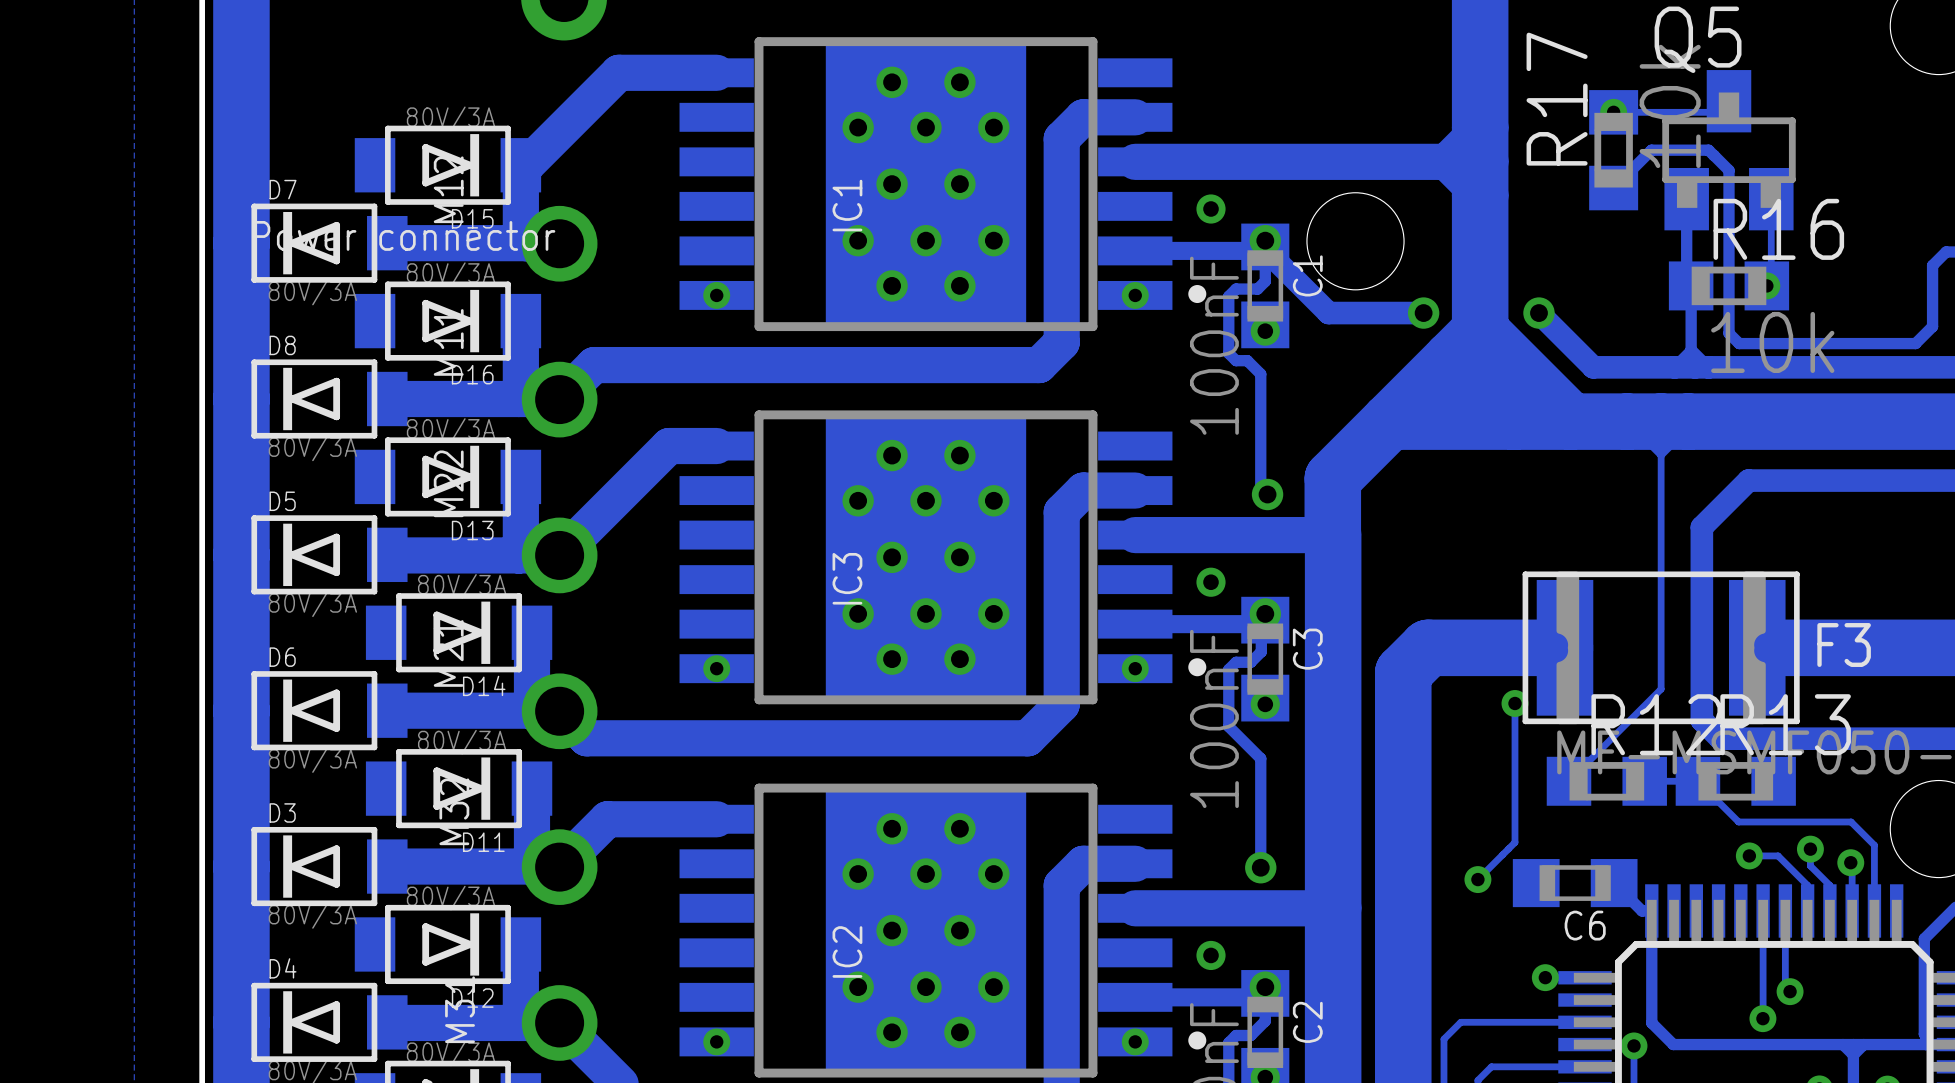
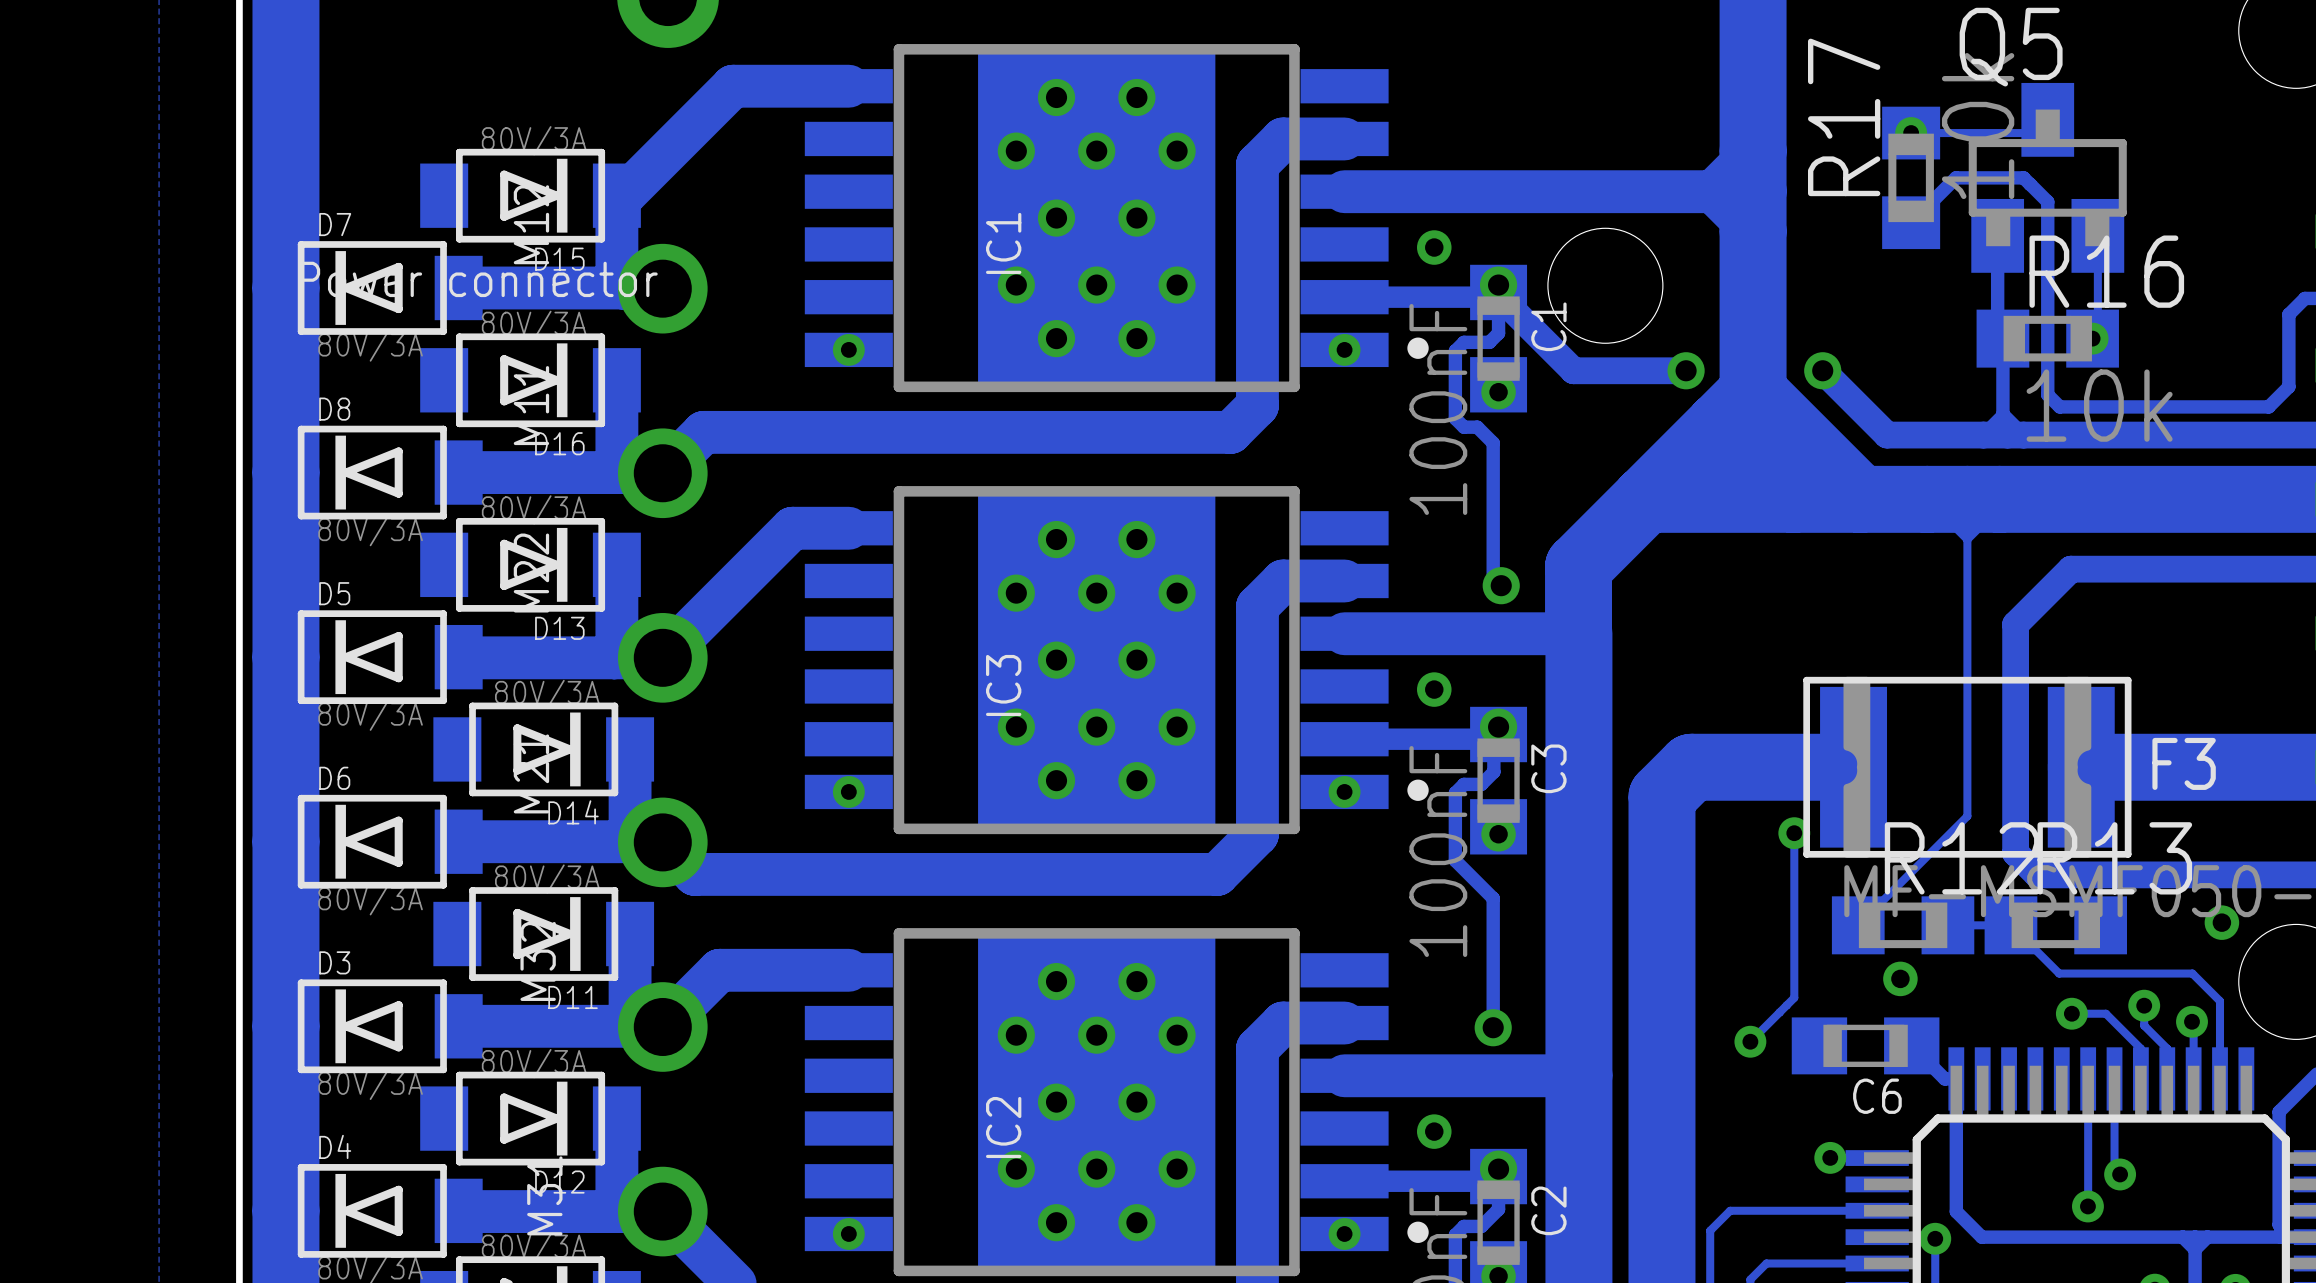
via: none -> (2221, 922)
via: none -> (1900, 978)

